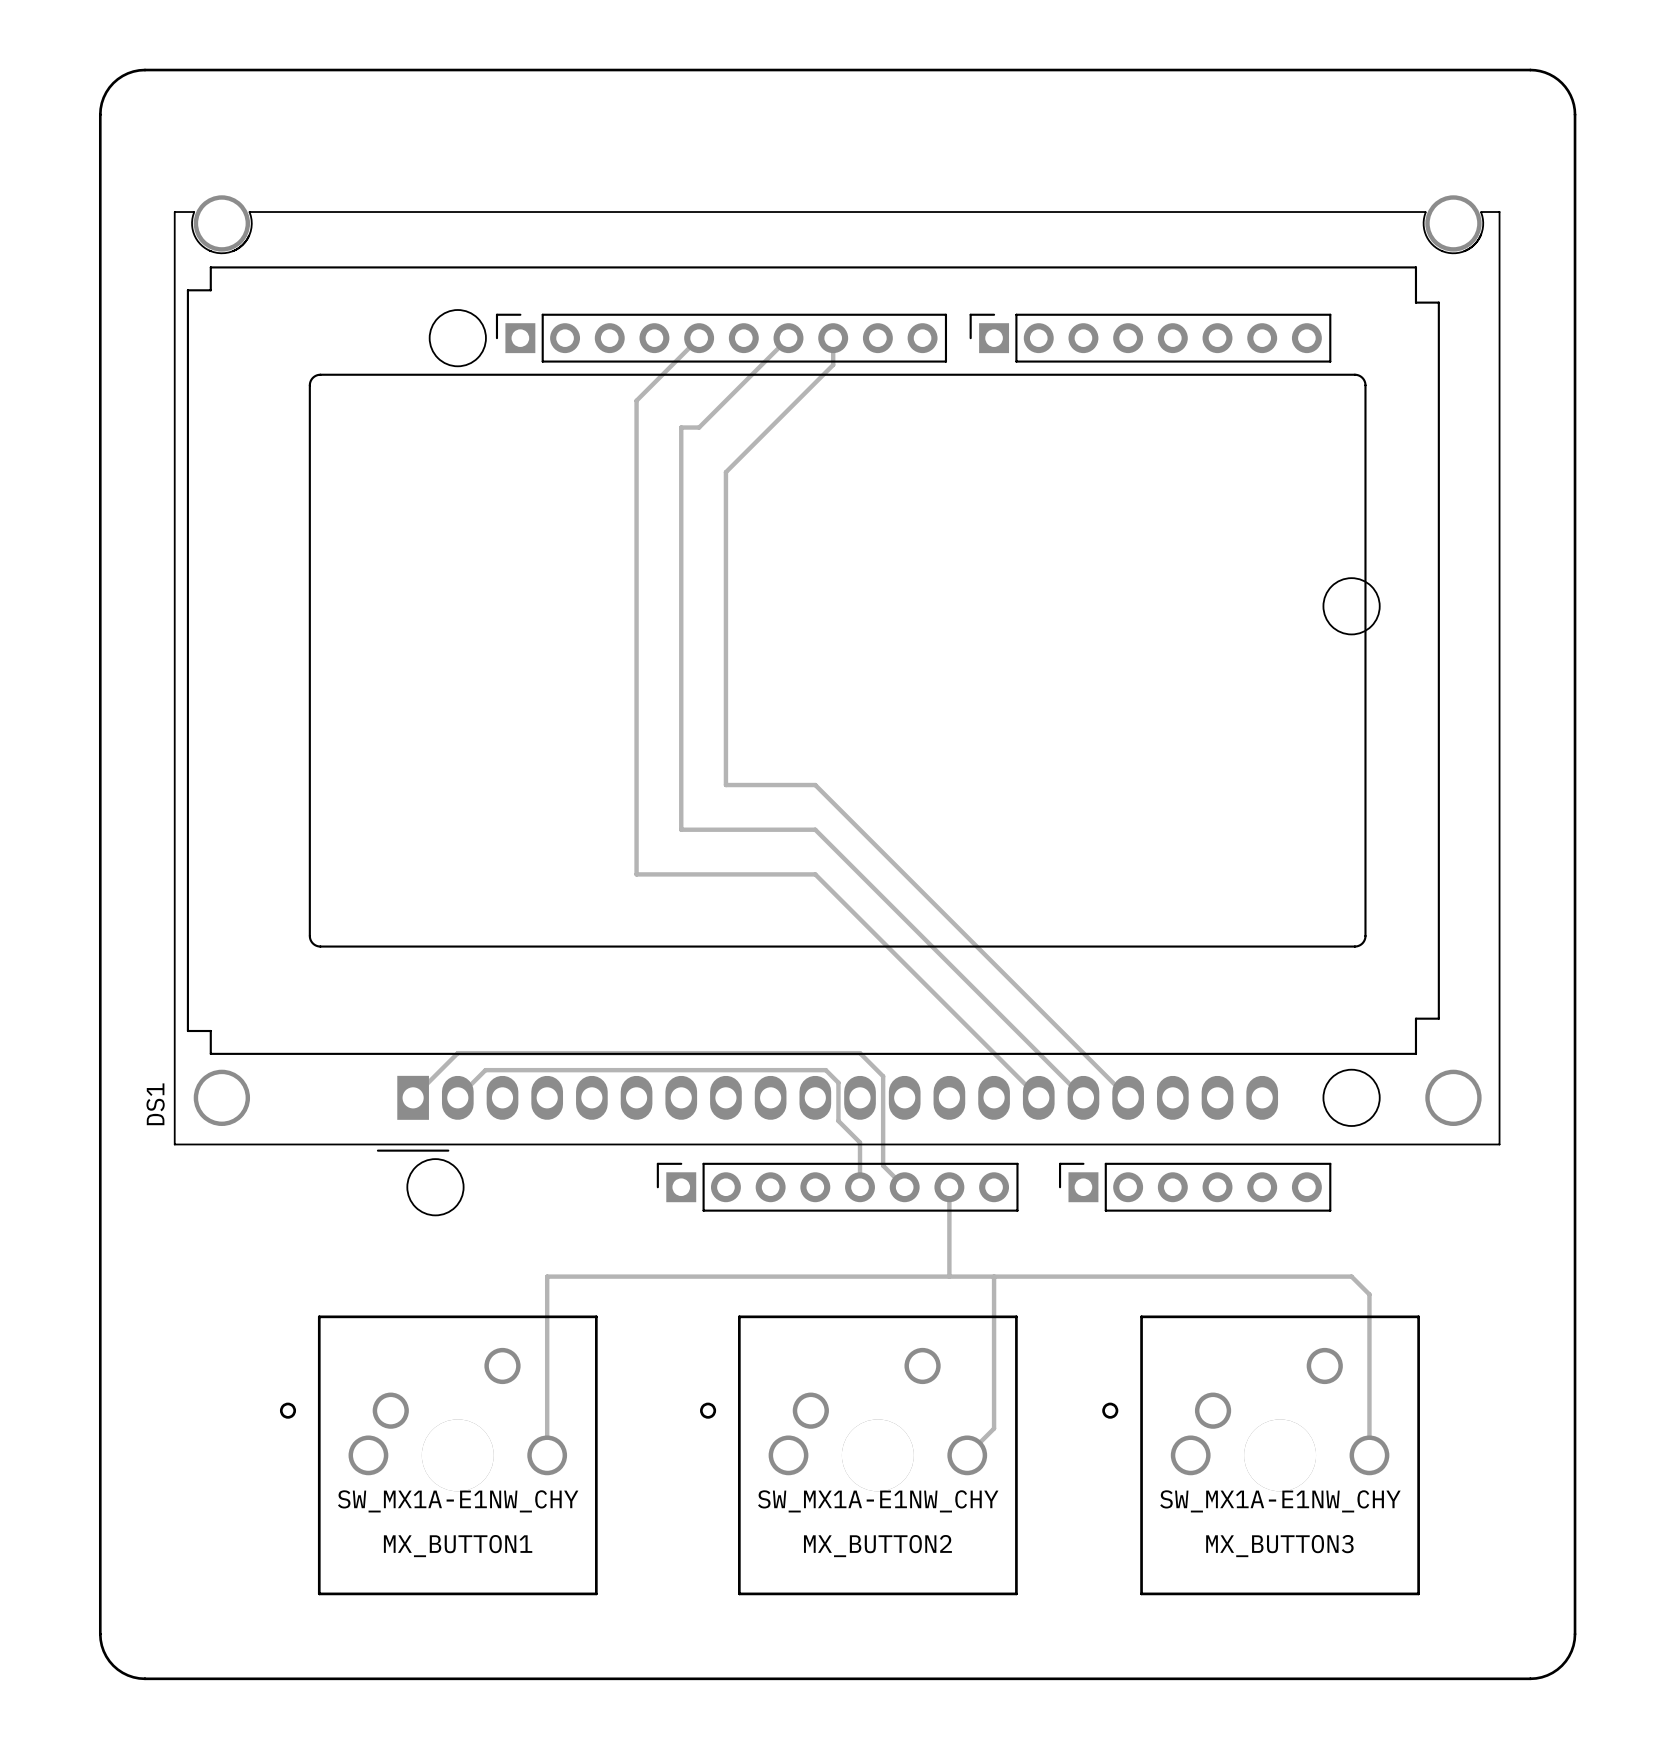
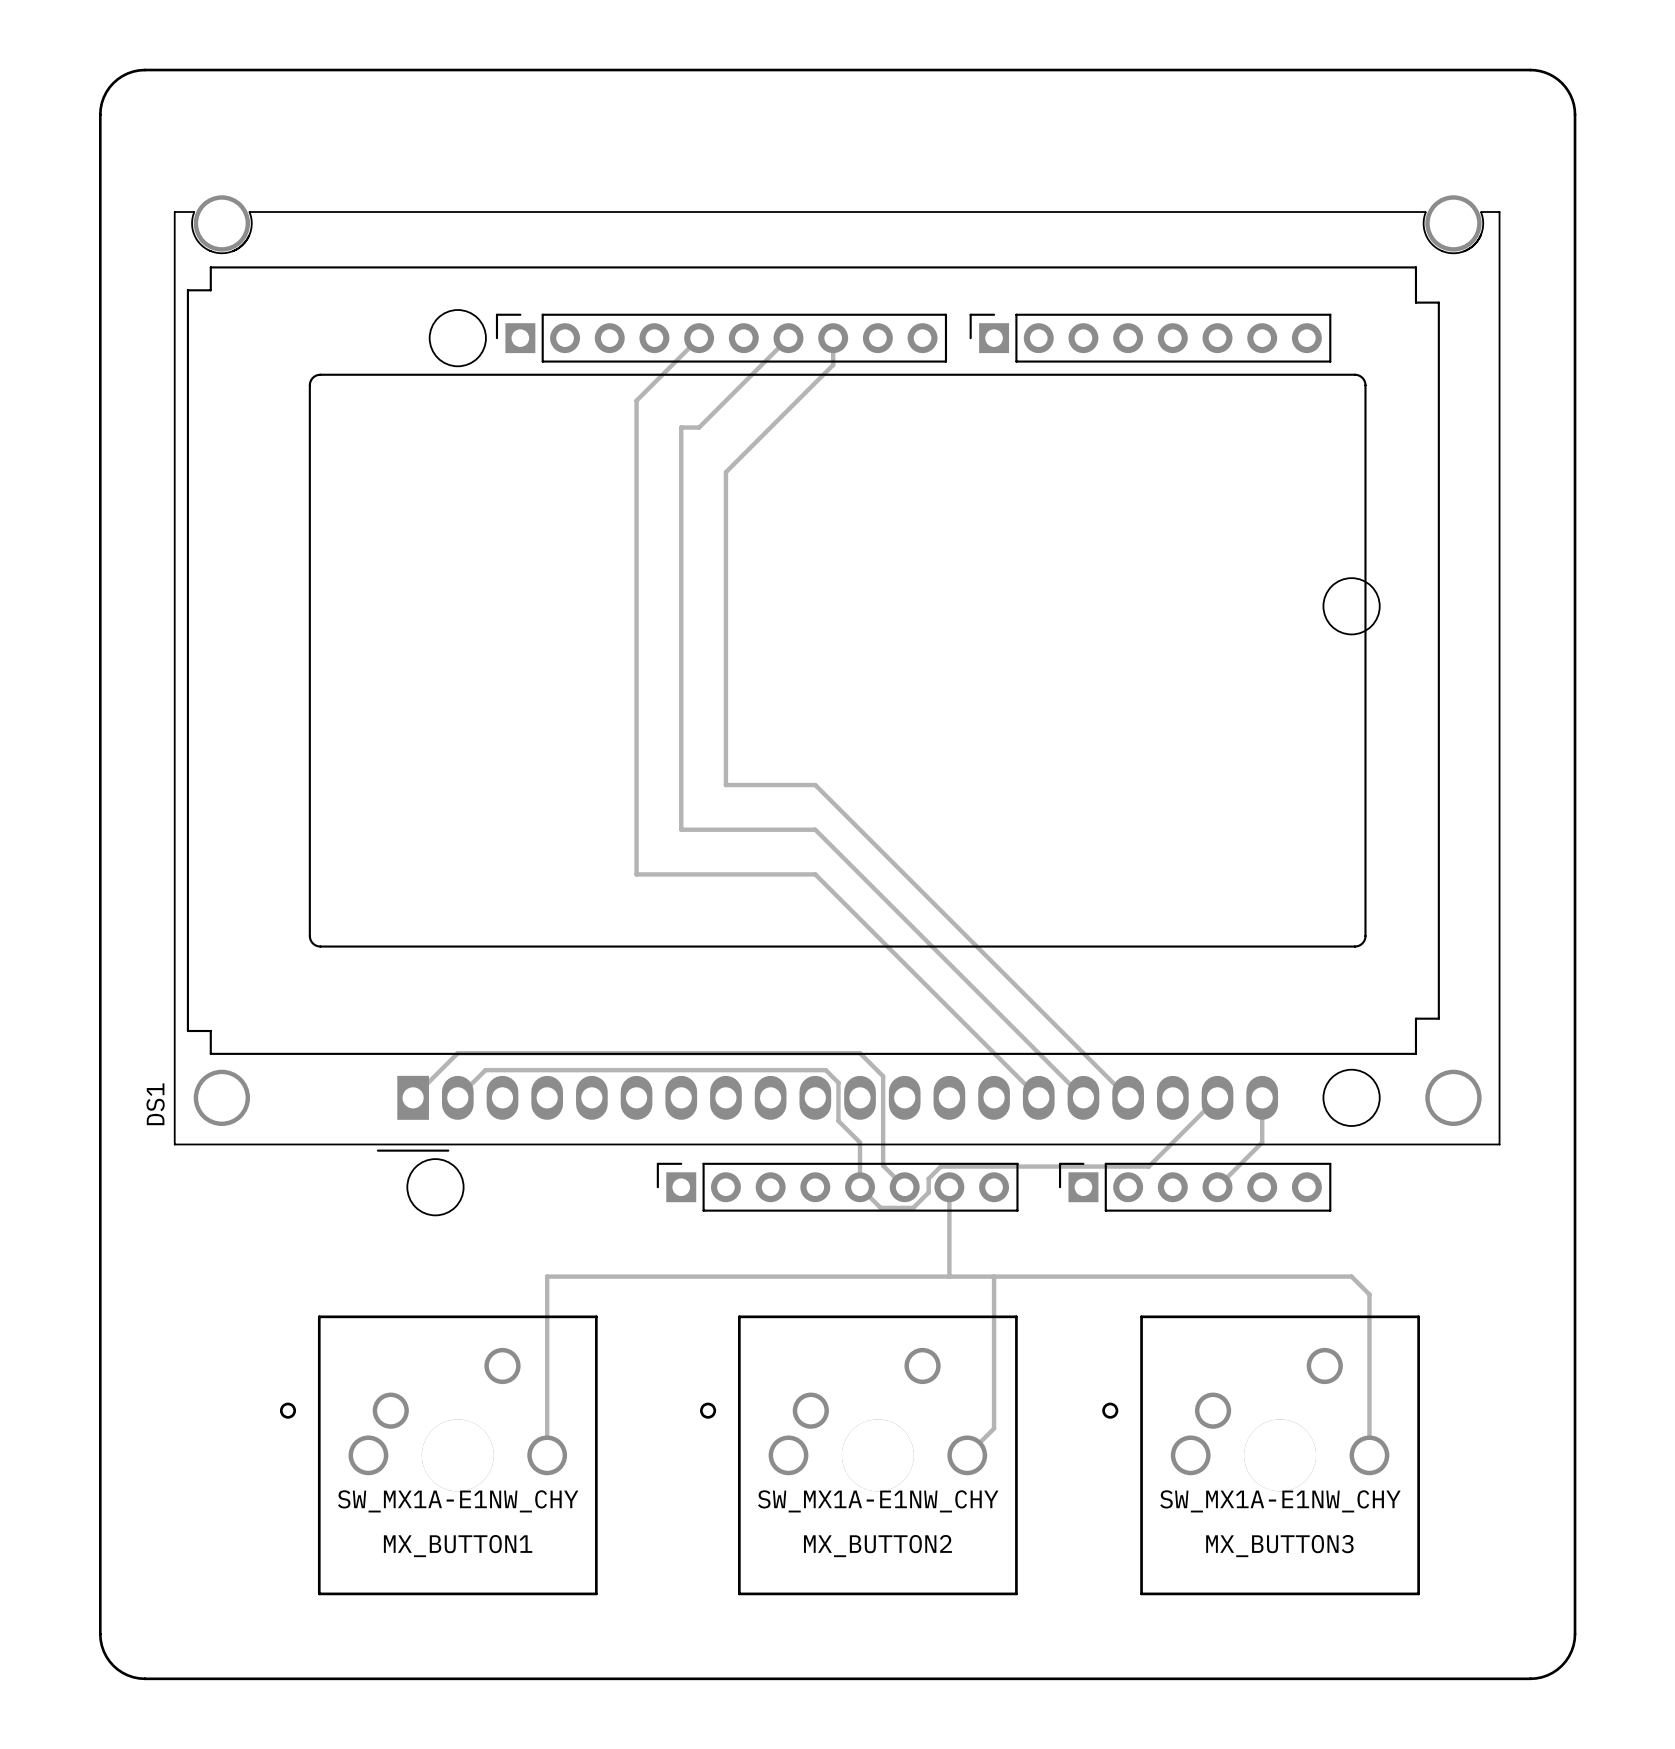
track: none -> (1217, 1097) (1148, 1166) (940, 1166) (928, 1178) (928, 1192) (913, 1207) (880, 1207) (860, 1187)
track: none -> (1262, 1097) (1262, 1142) (1217, 1187)

